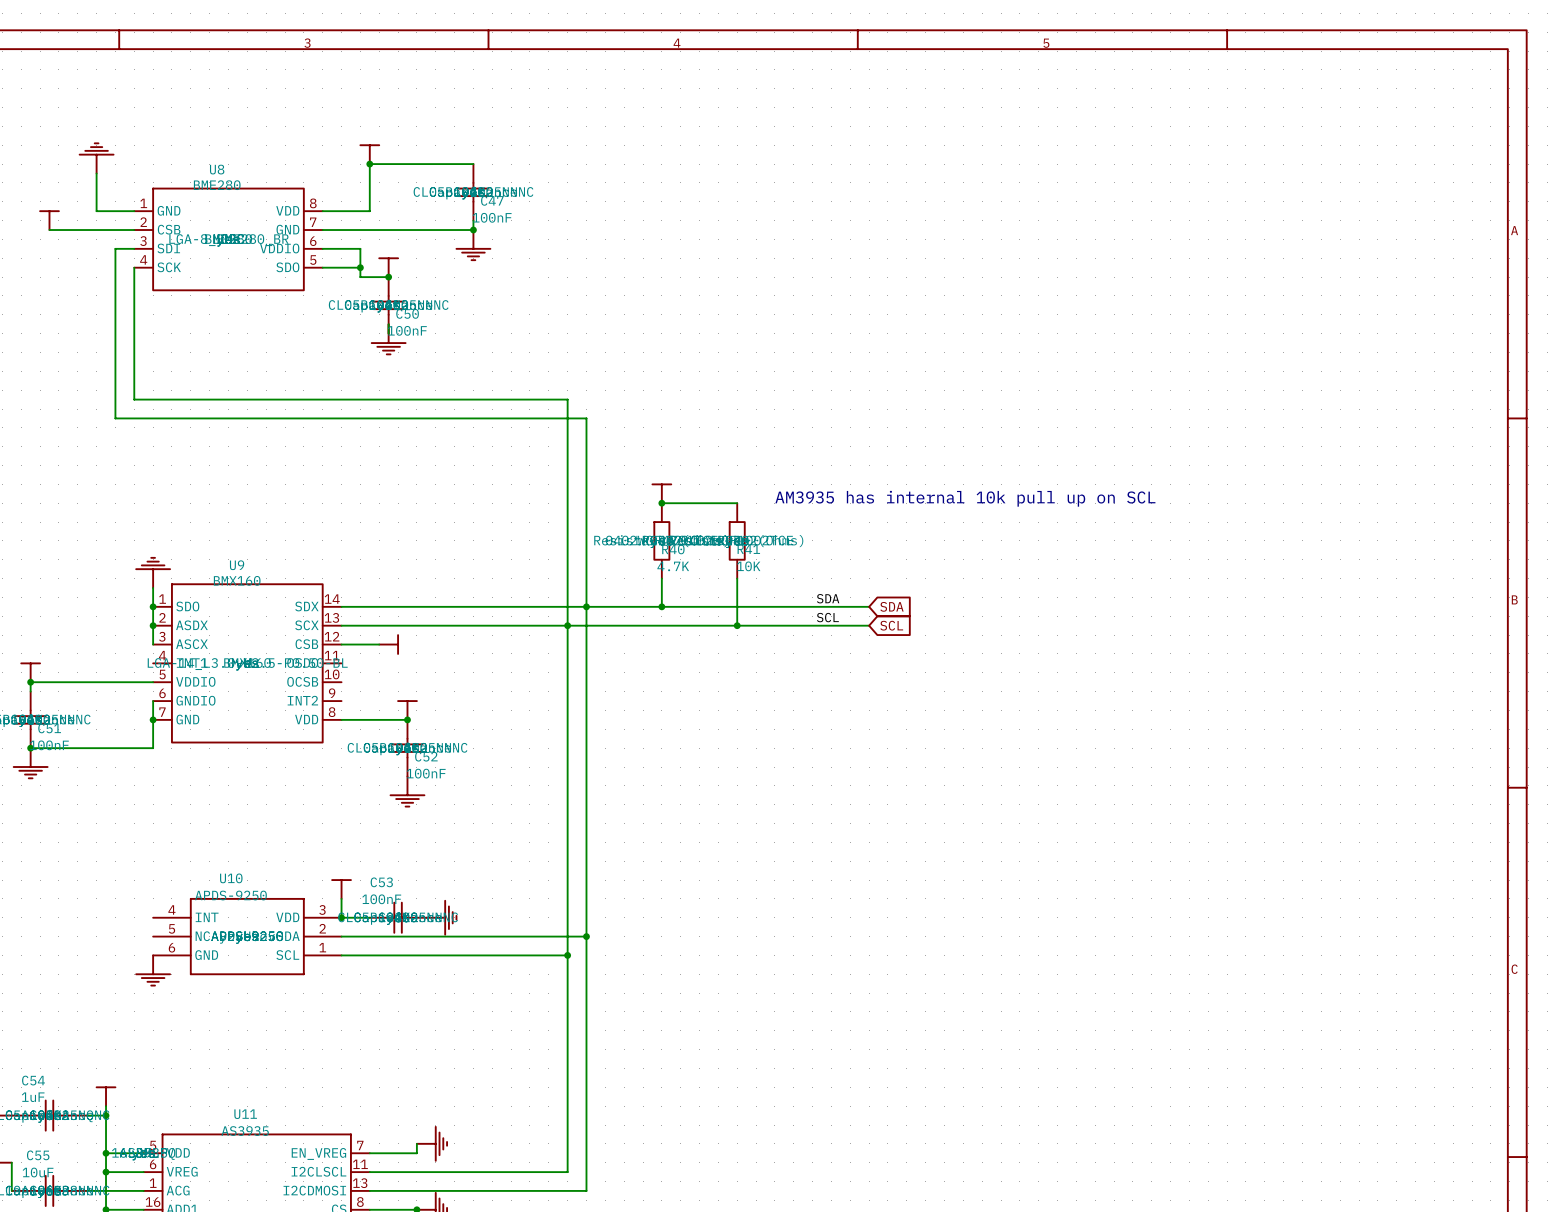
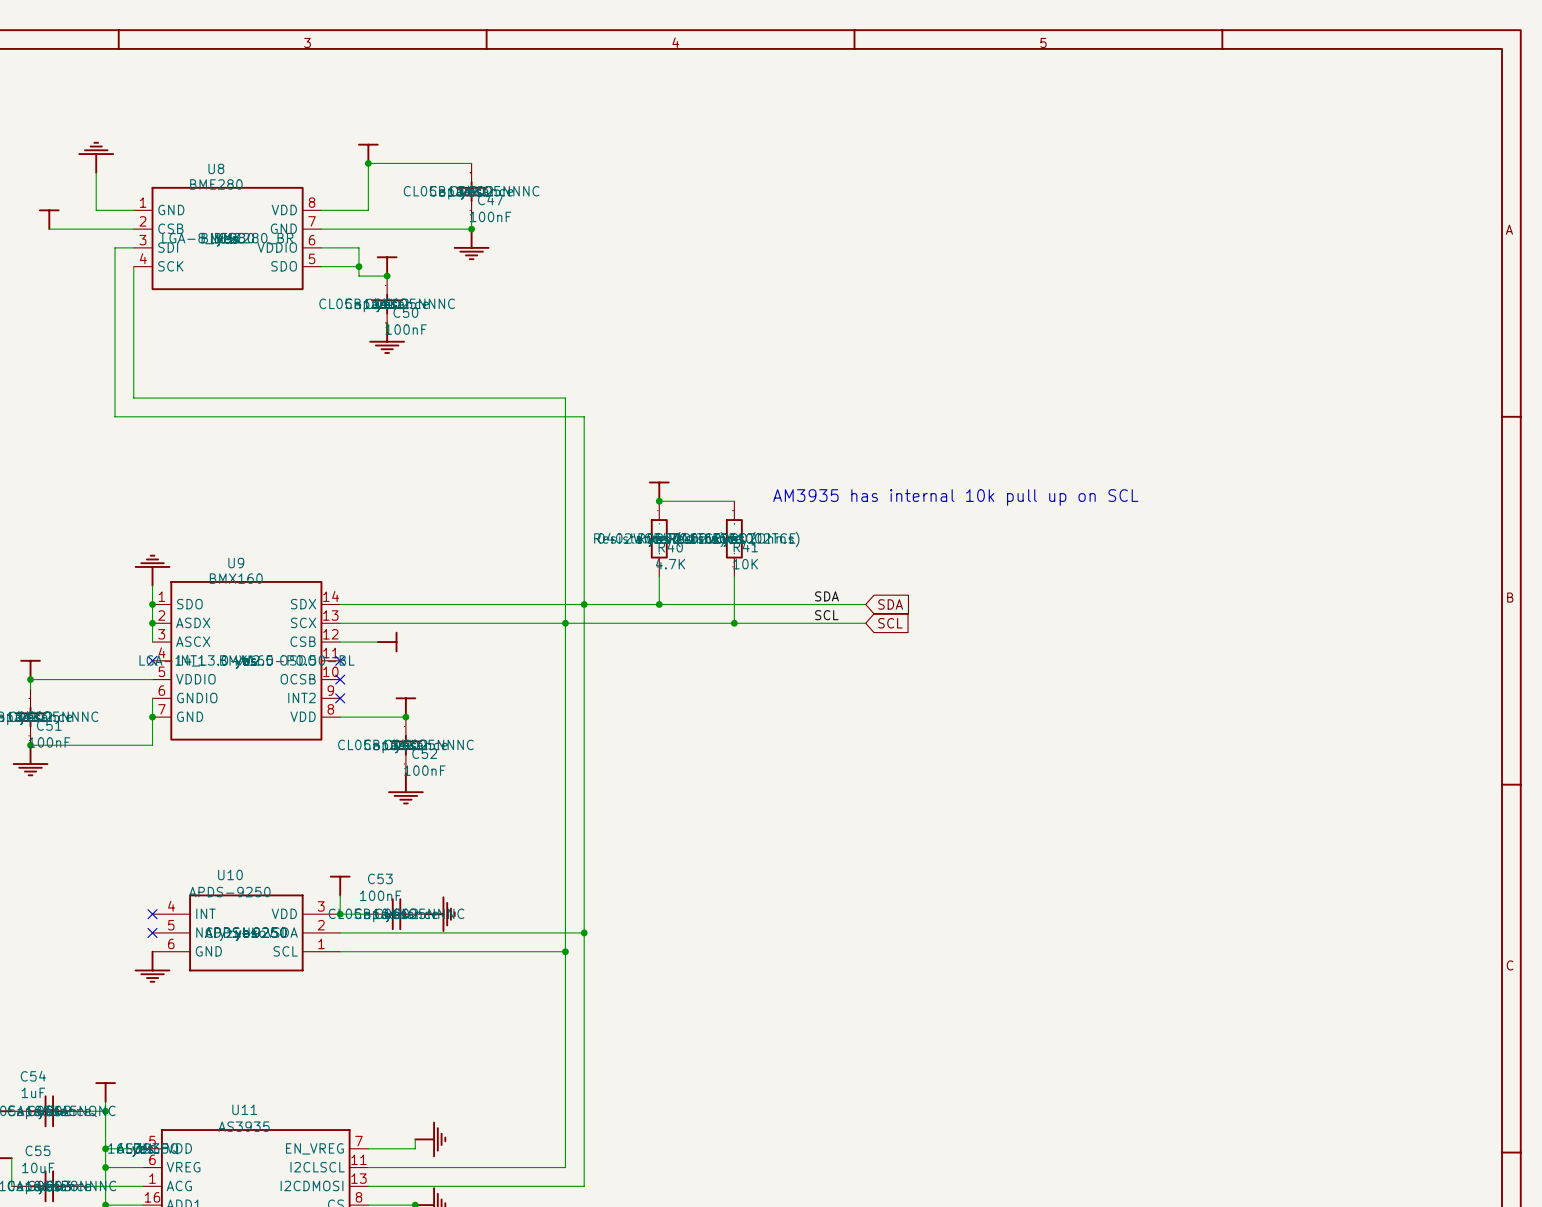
no-connect mark: none -> (152, 660)
no-connect mark: none -> (340, 660)
no-connect mark: none -> (340, 679)
no-connect mark: none -> (340, 698)
no-connect mark: none -> (152, 914)
no-connect mark: none -> (152, 932)

